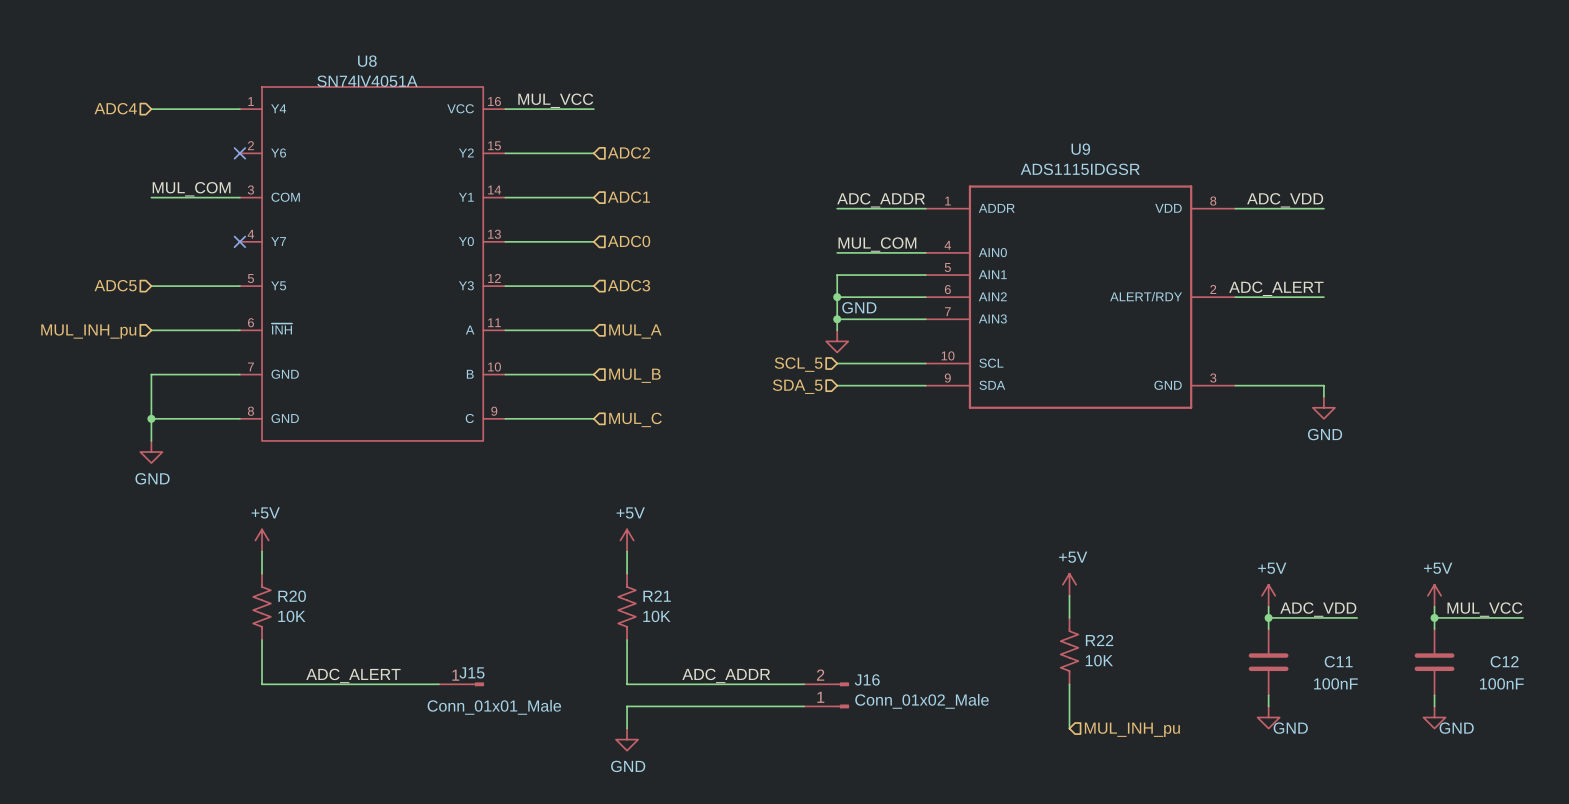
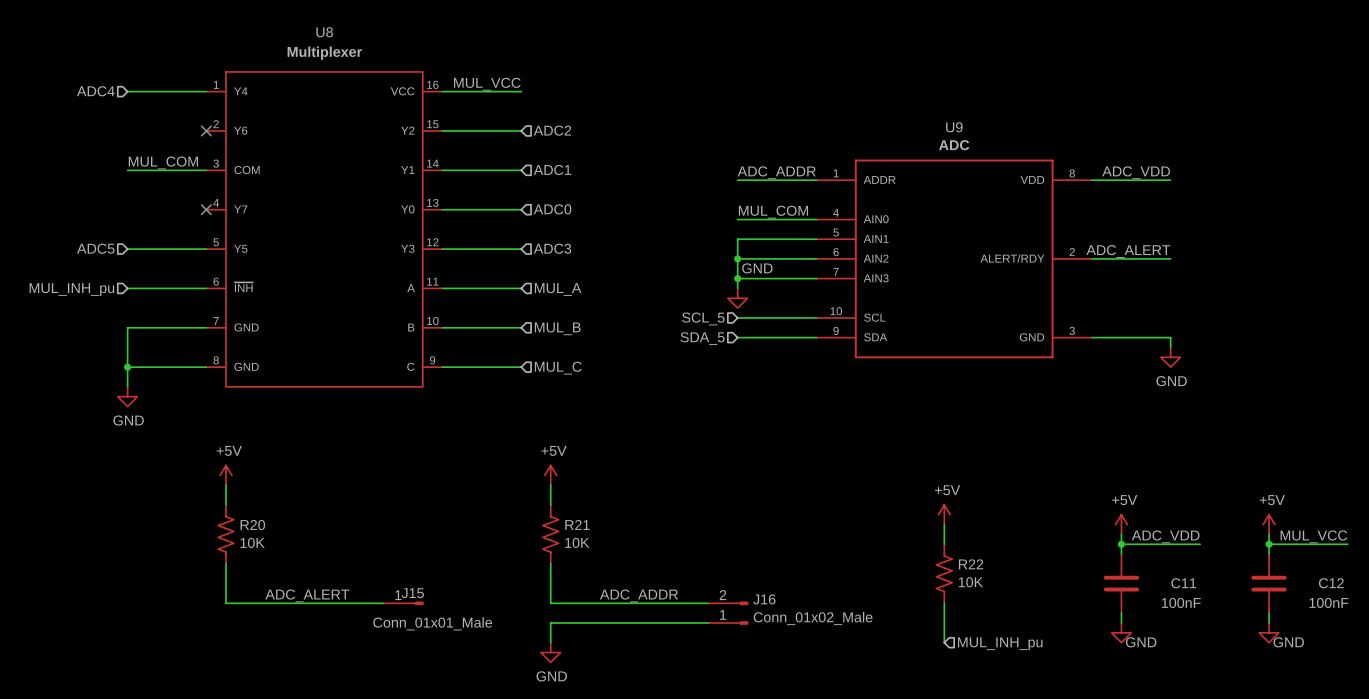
U8 name position: U8 (367, 61) -> U8 (324, 32)
U8 value: SN74lV4051A (367, 81) -> Multiplexer (324, 53)
U9 value: ADS1115IDGSR (1080, 169) -> ADC (954, 145)

